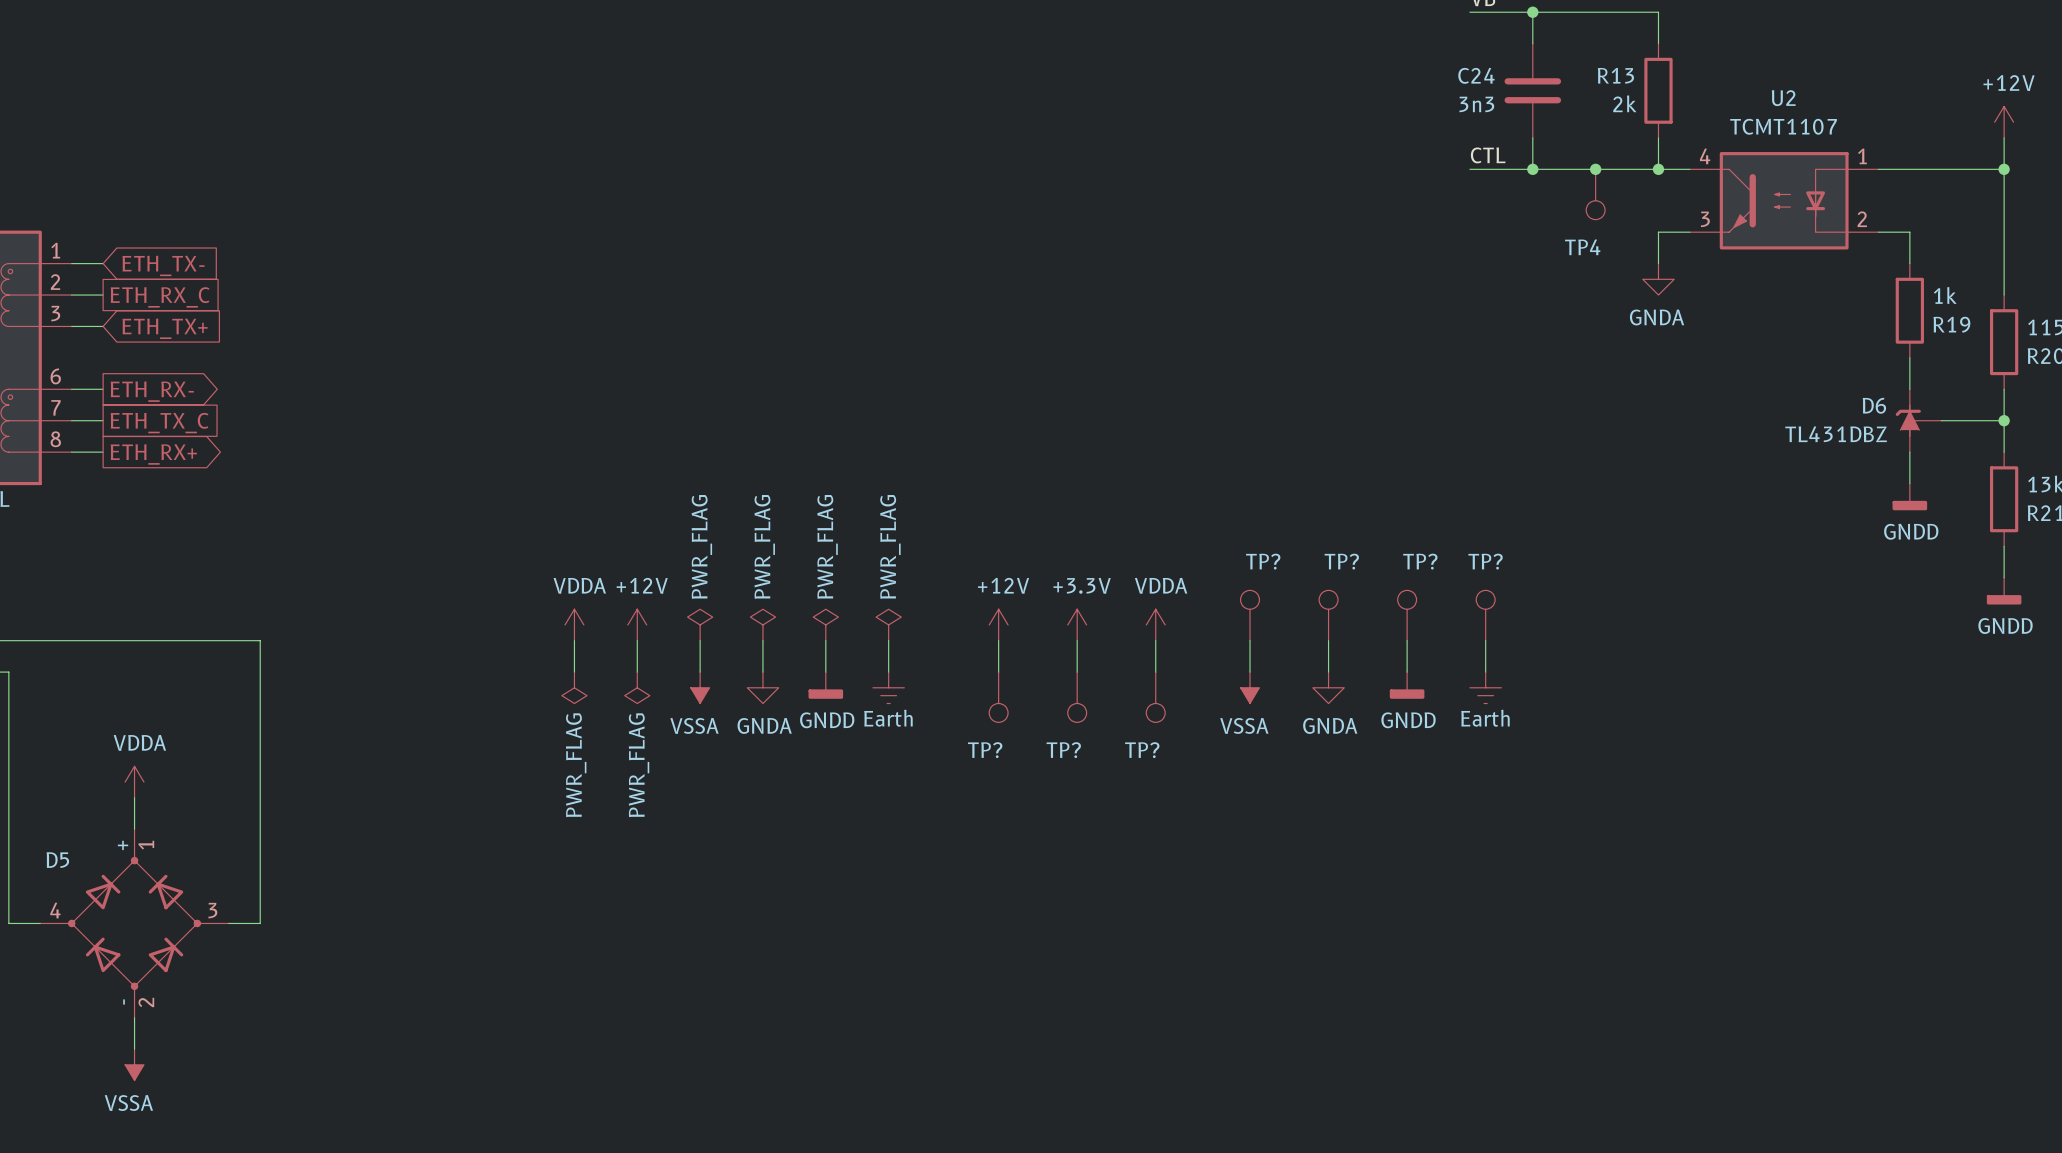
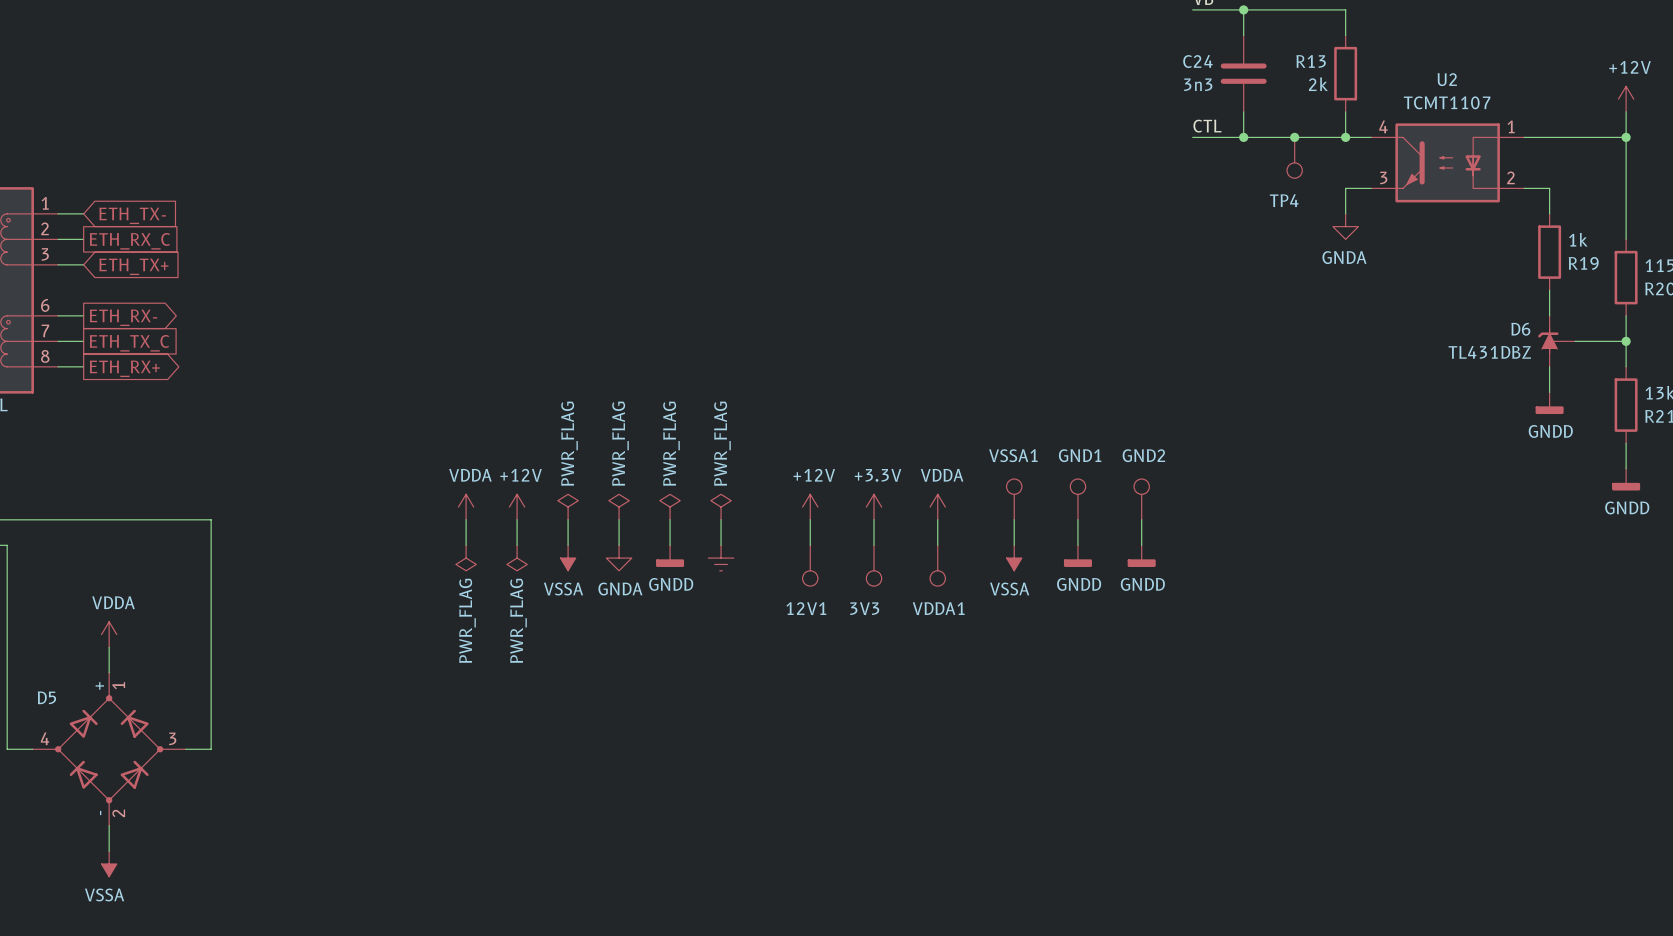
TP? name: TP? (1263, 561) -> VSSA1 (1013, 455)
TP? name: TP? (1341, 561) -> GND1 (1080, 455)
TP? name: TP? (1420, 561) -> GND2 (1143, 455)
TP?: (1485, 615) -> none
wire: (1485, 640) (1485, 672) -> none
power symbol: GNDA (1328, 687) -> GNDD (1077, 556)
power symbol: Earth (1485, 687) -> none
power symbol text: Earth (888, 718) -> none
TP? name: TP? (985, 750) -> 12V1 (806, 608)
TP? name: TP? (1063, 750) -> 3V3 (864, 608)
TP? name: TP? (1142, 750) -> VDDA1 (938, 608)

